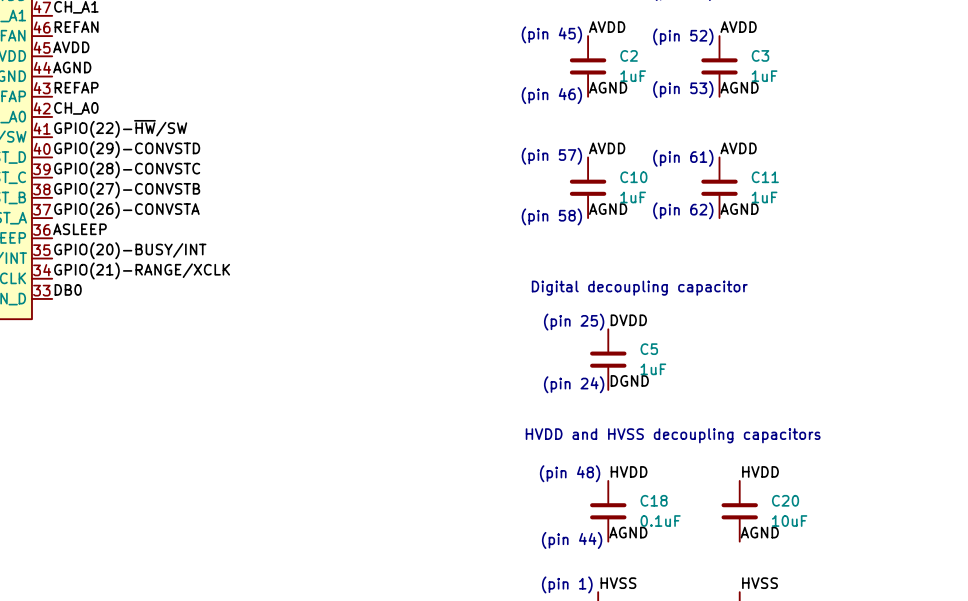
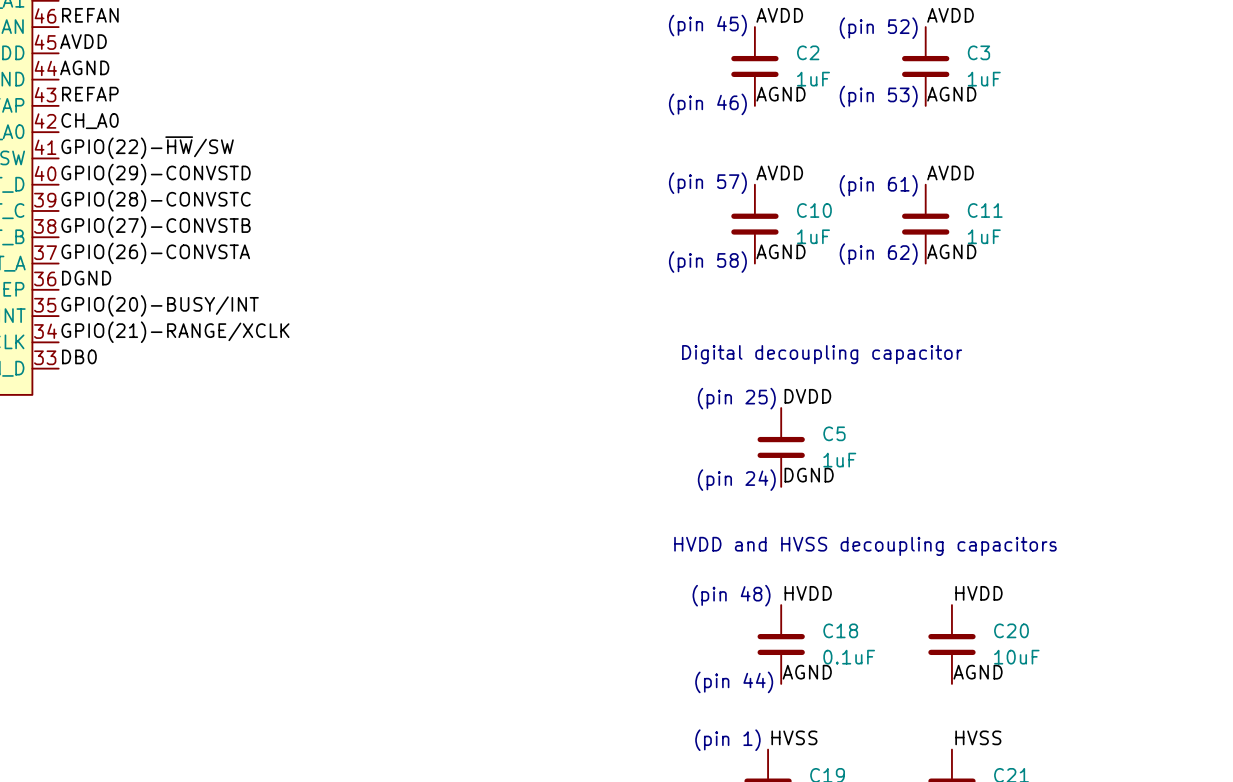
label: ASLEEP (79, 229) -> DGND (86, 278)

